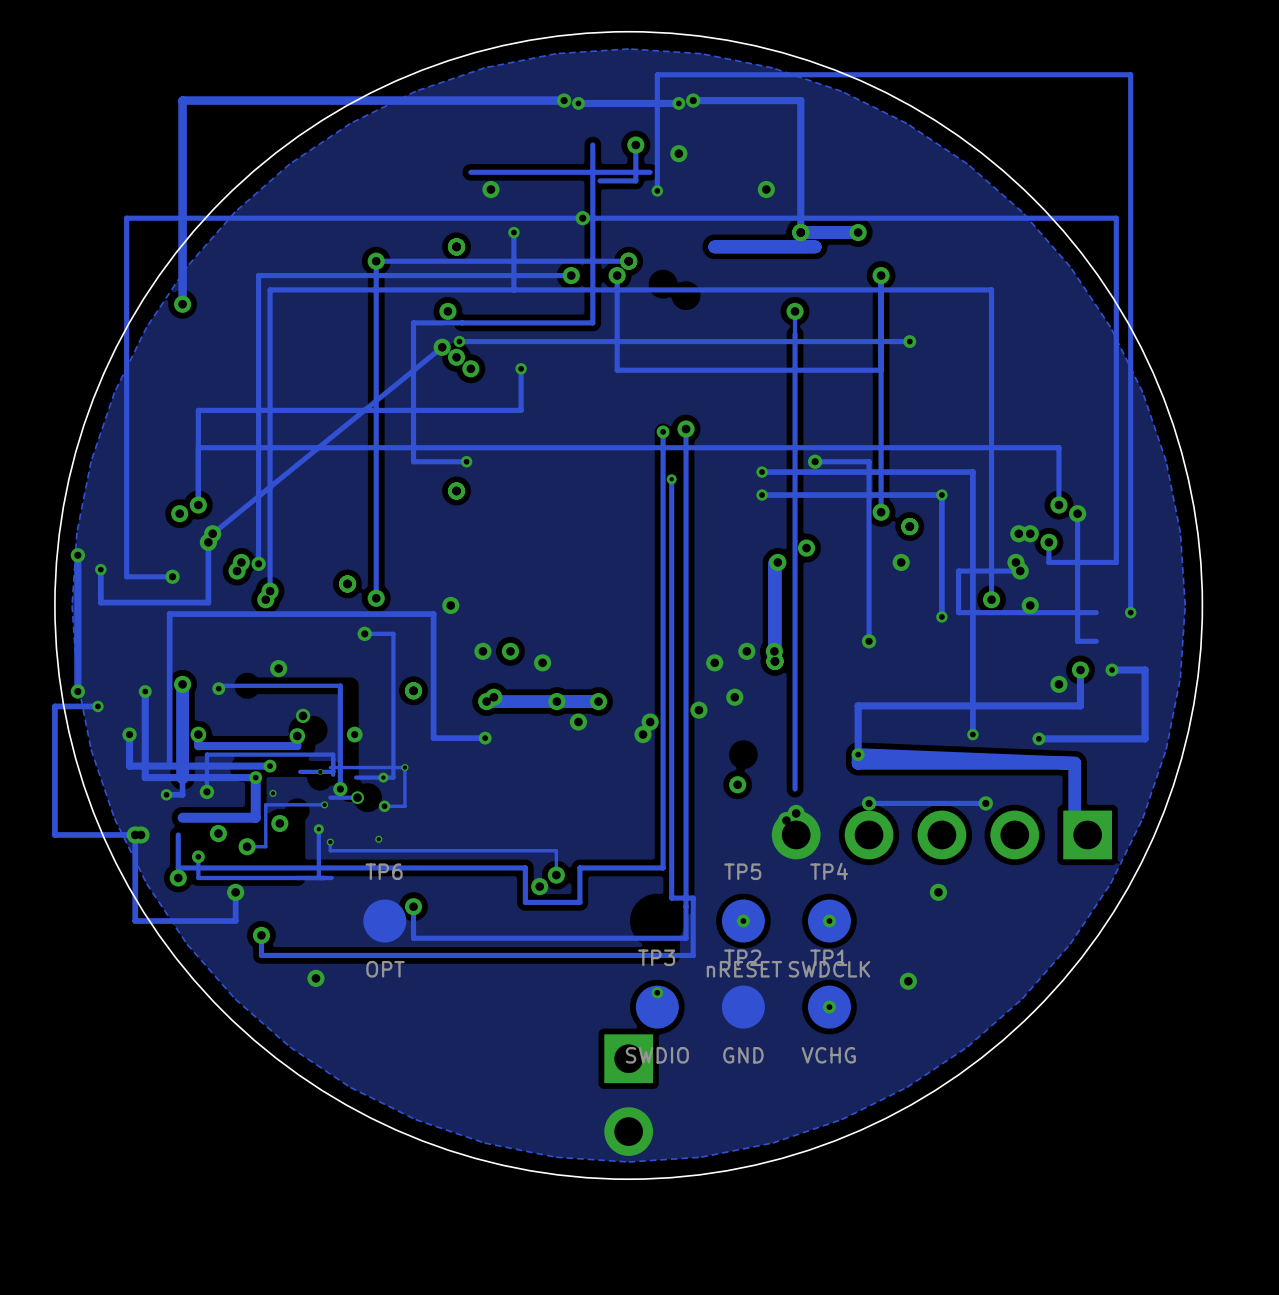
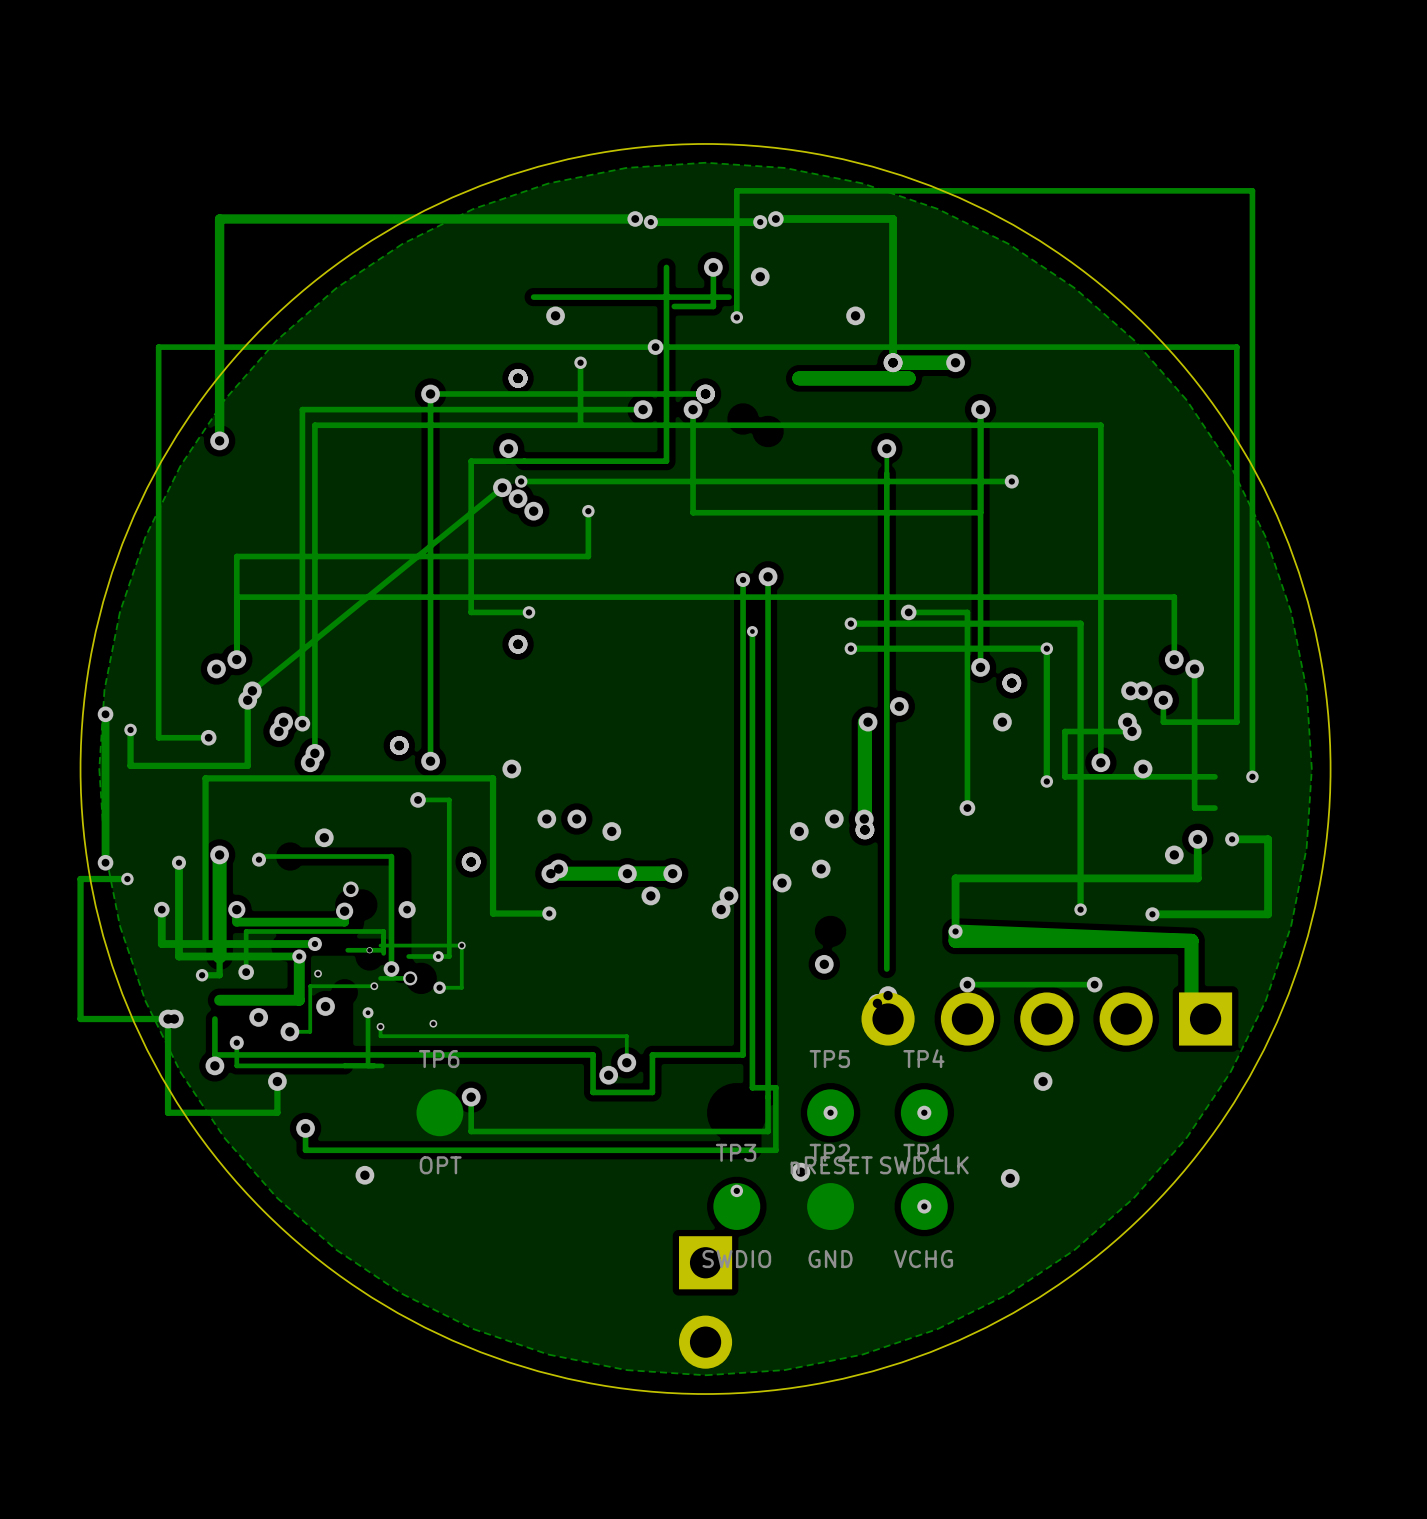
via: none -> (800, 1172)

